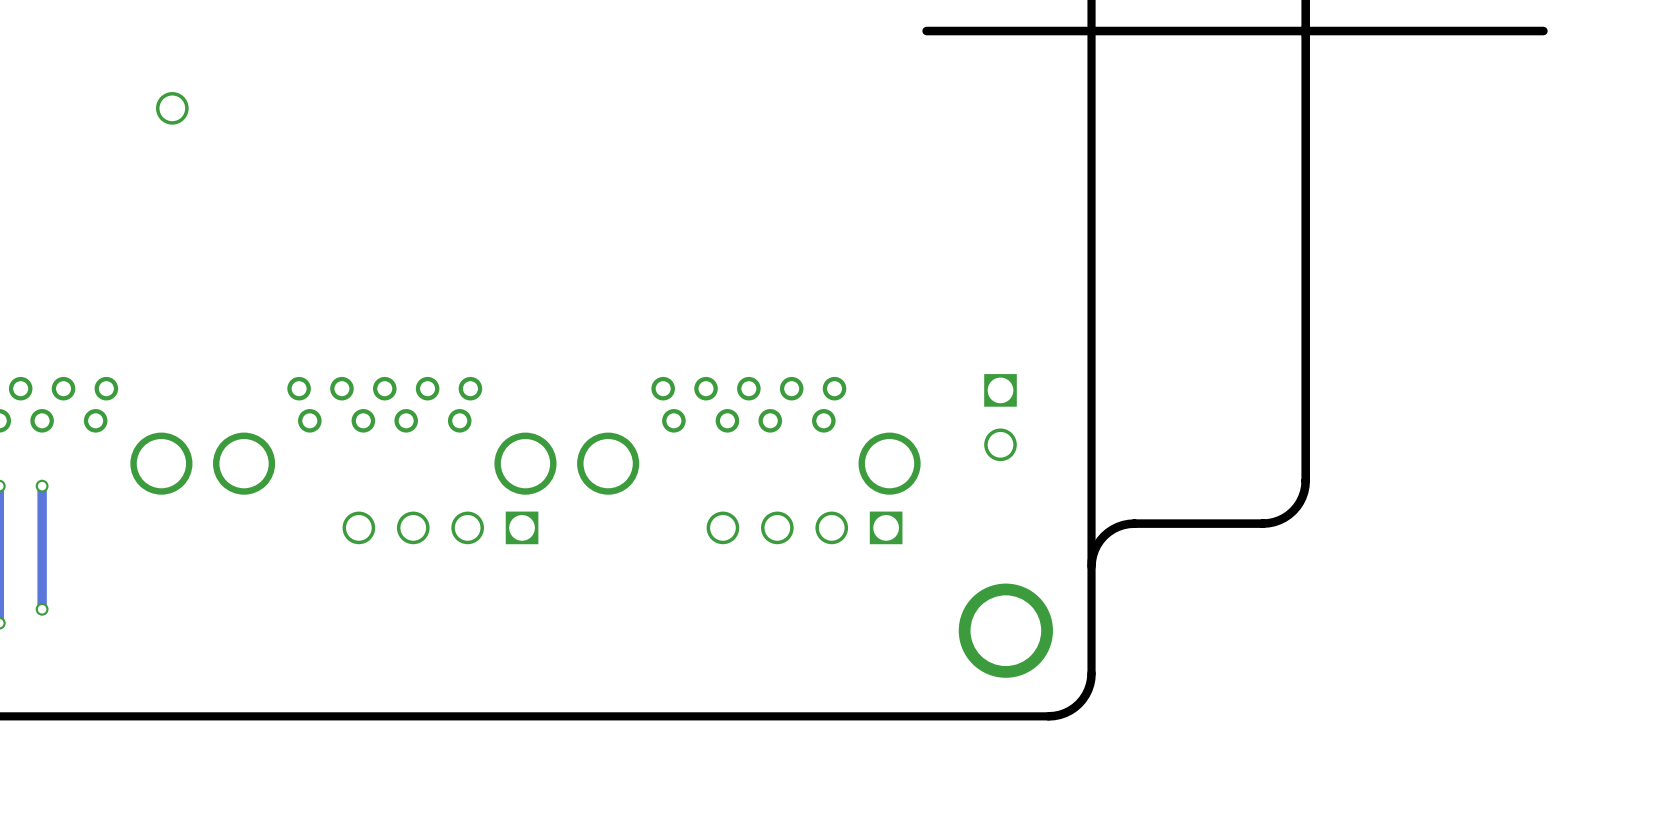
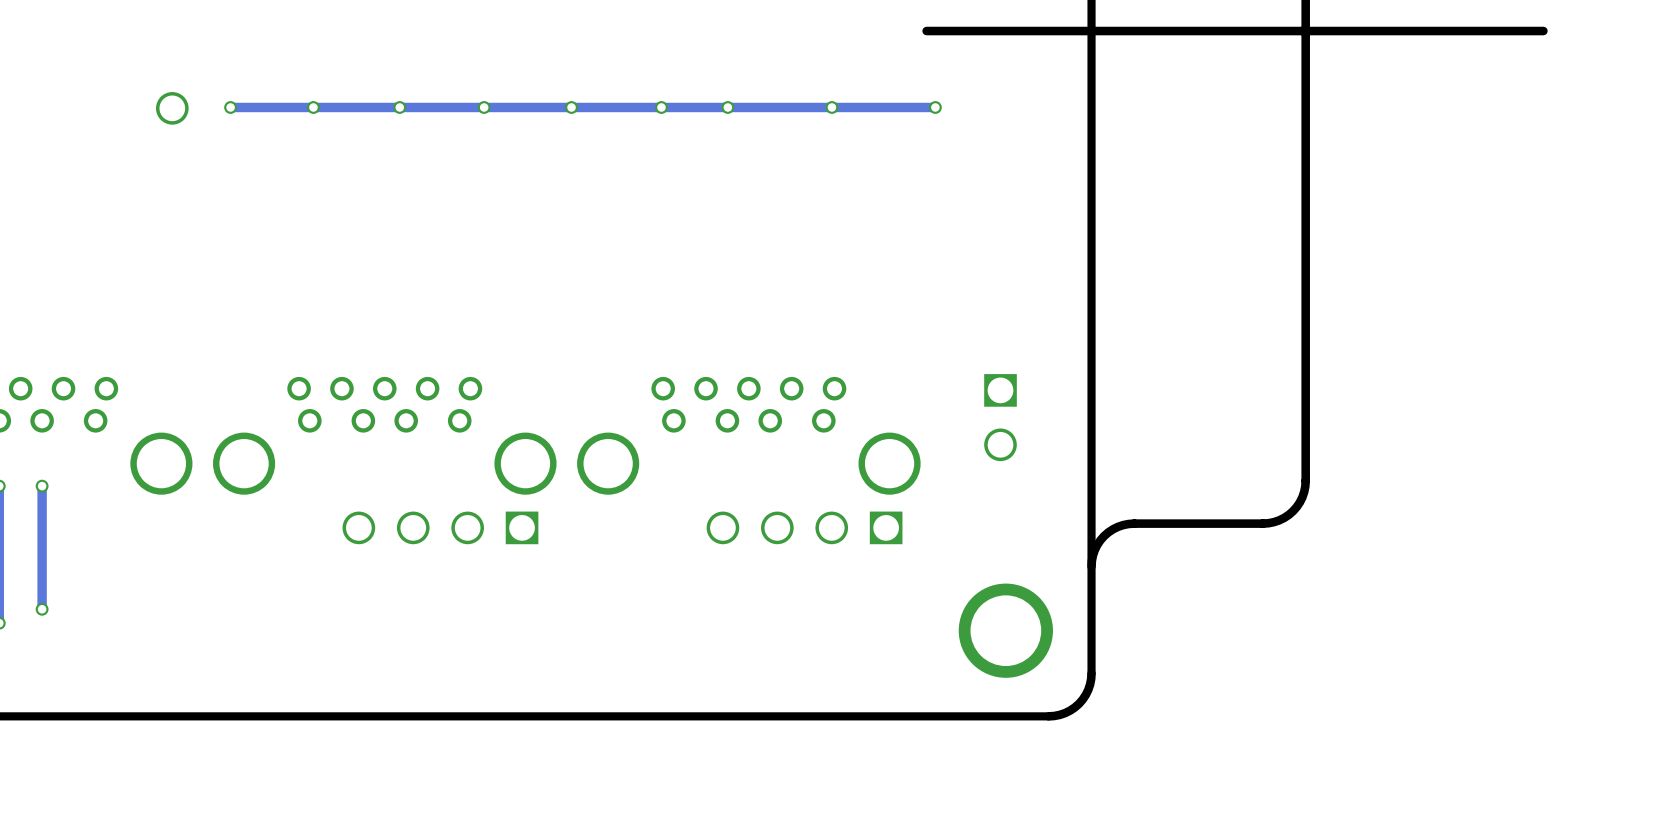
via: none -> (230, 107)
via: none -> (313, 107)
via: none -> (399, 107)
via: none -> (484, 107)
via: none -> (571, 107)
via: none -> (661, 107)
via: none -> (727, 107)
via: none -> (831, 107)
track: none -> (935, 107) (230, 107)
via: none -> (935, 107)

